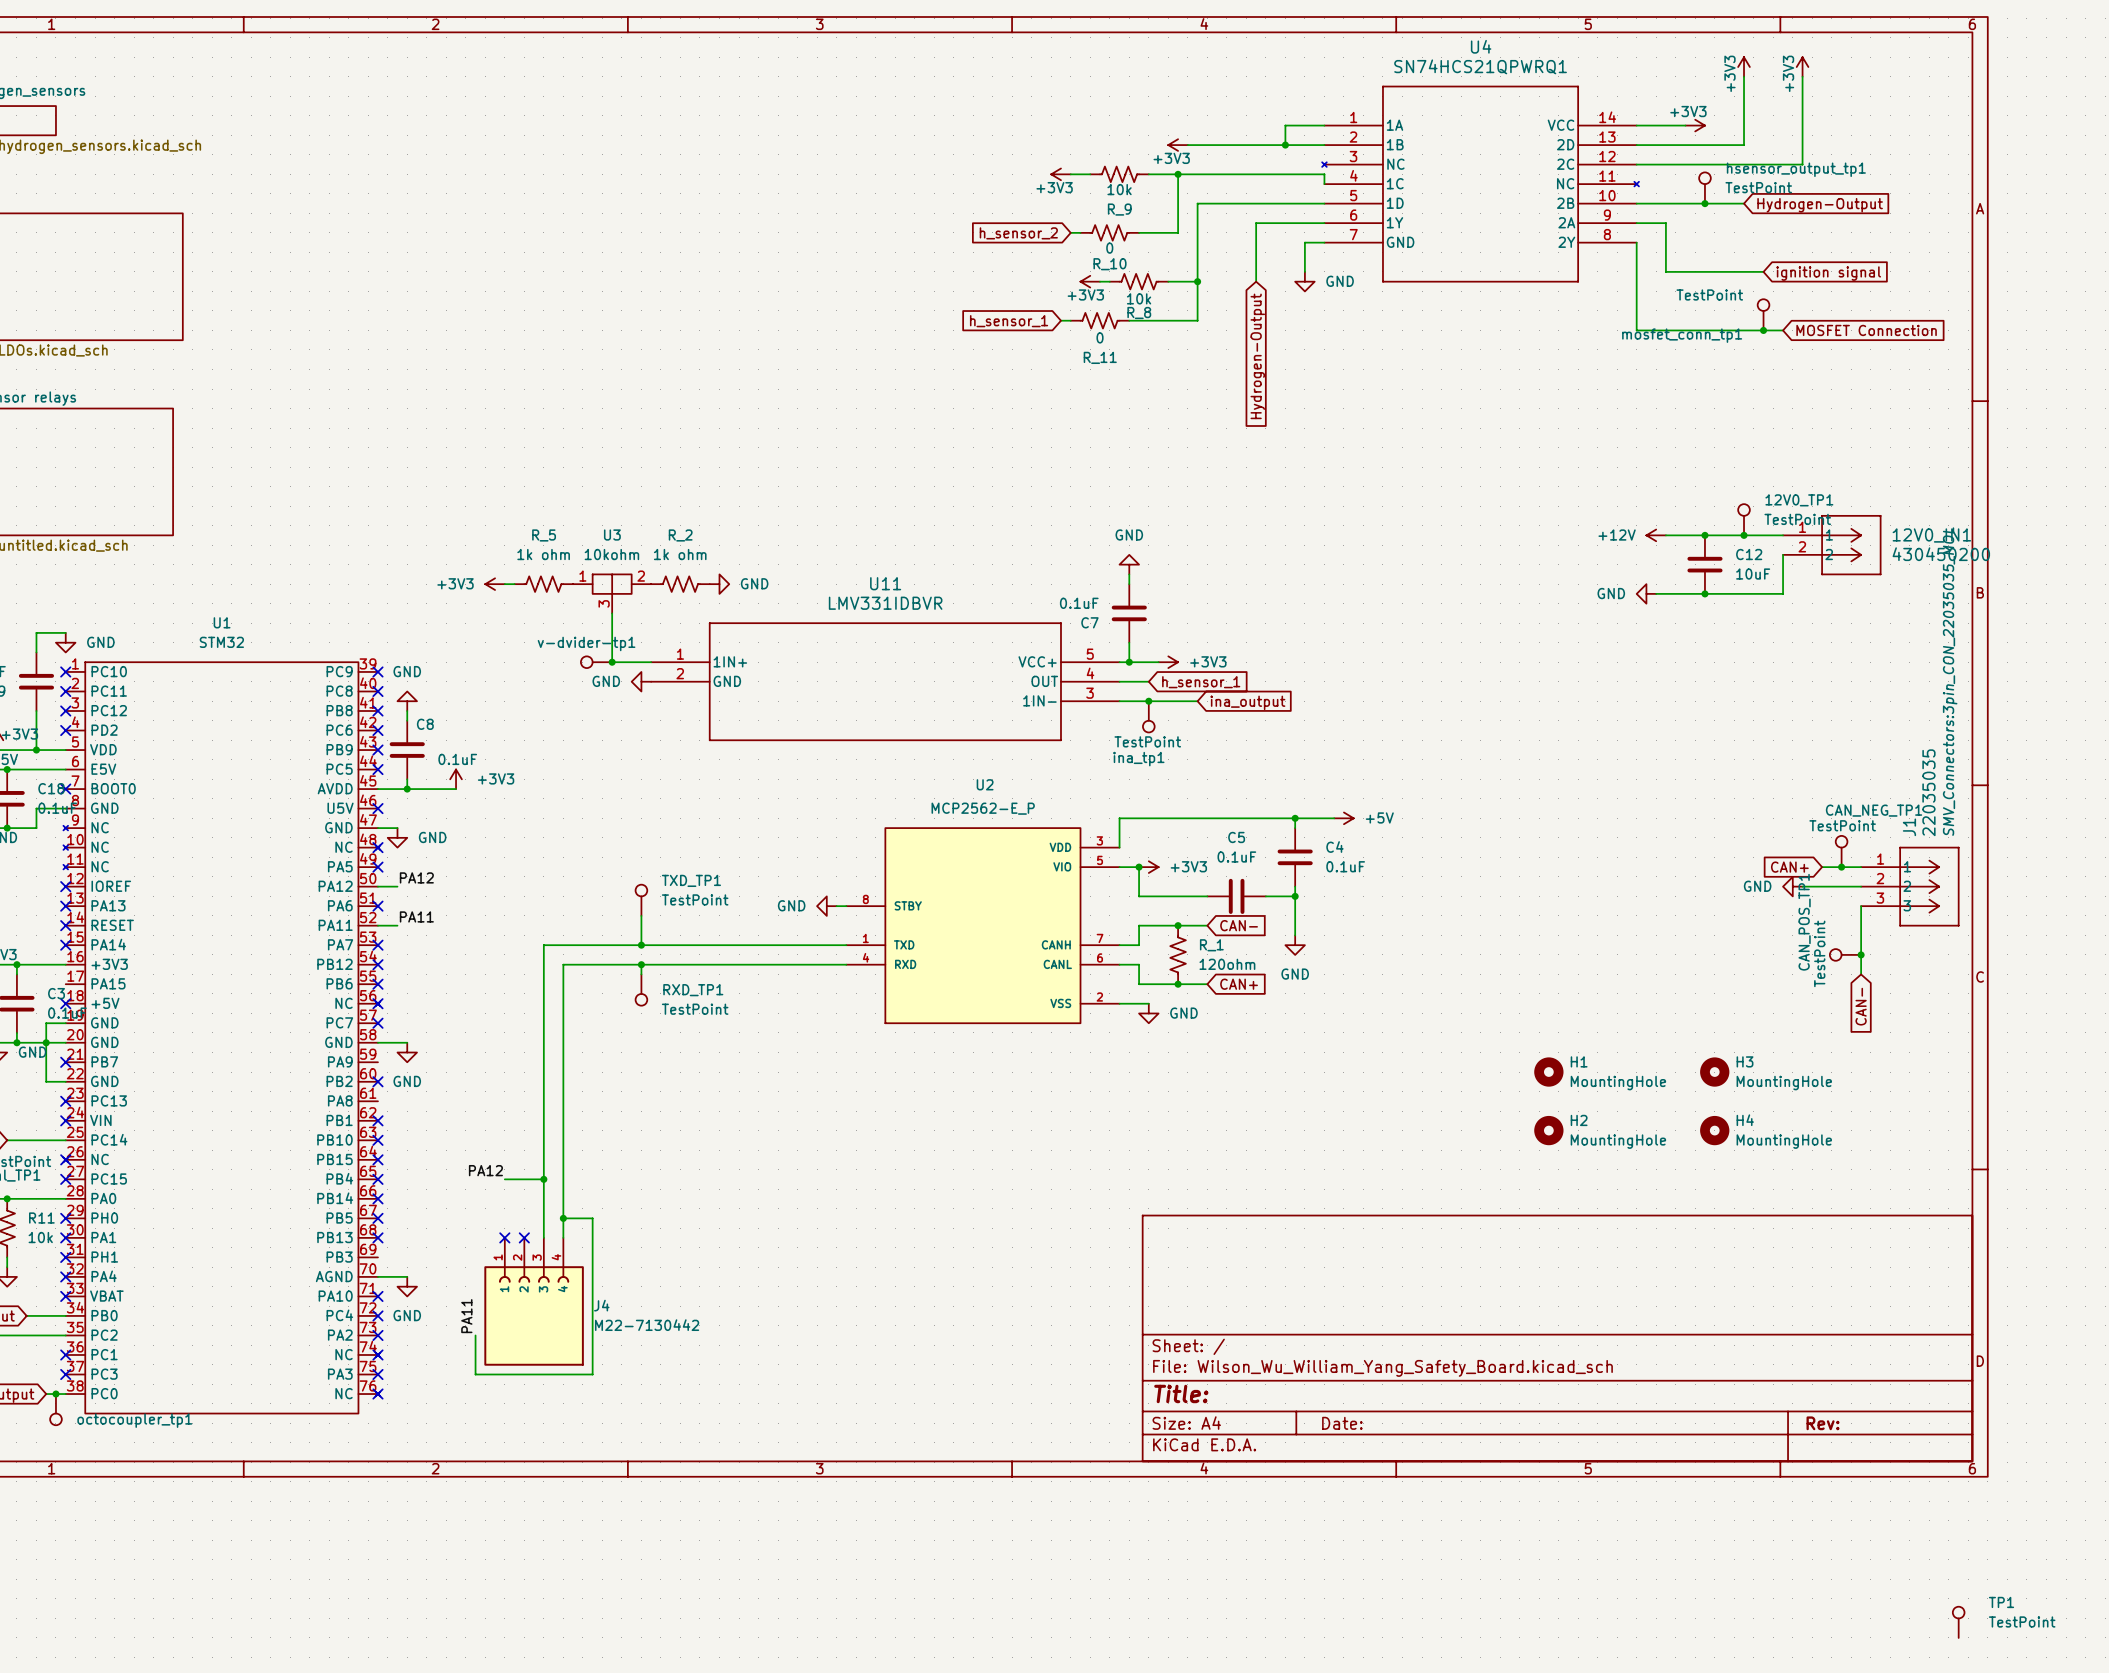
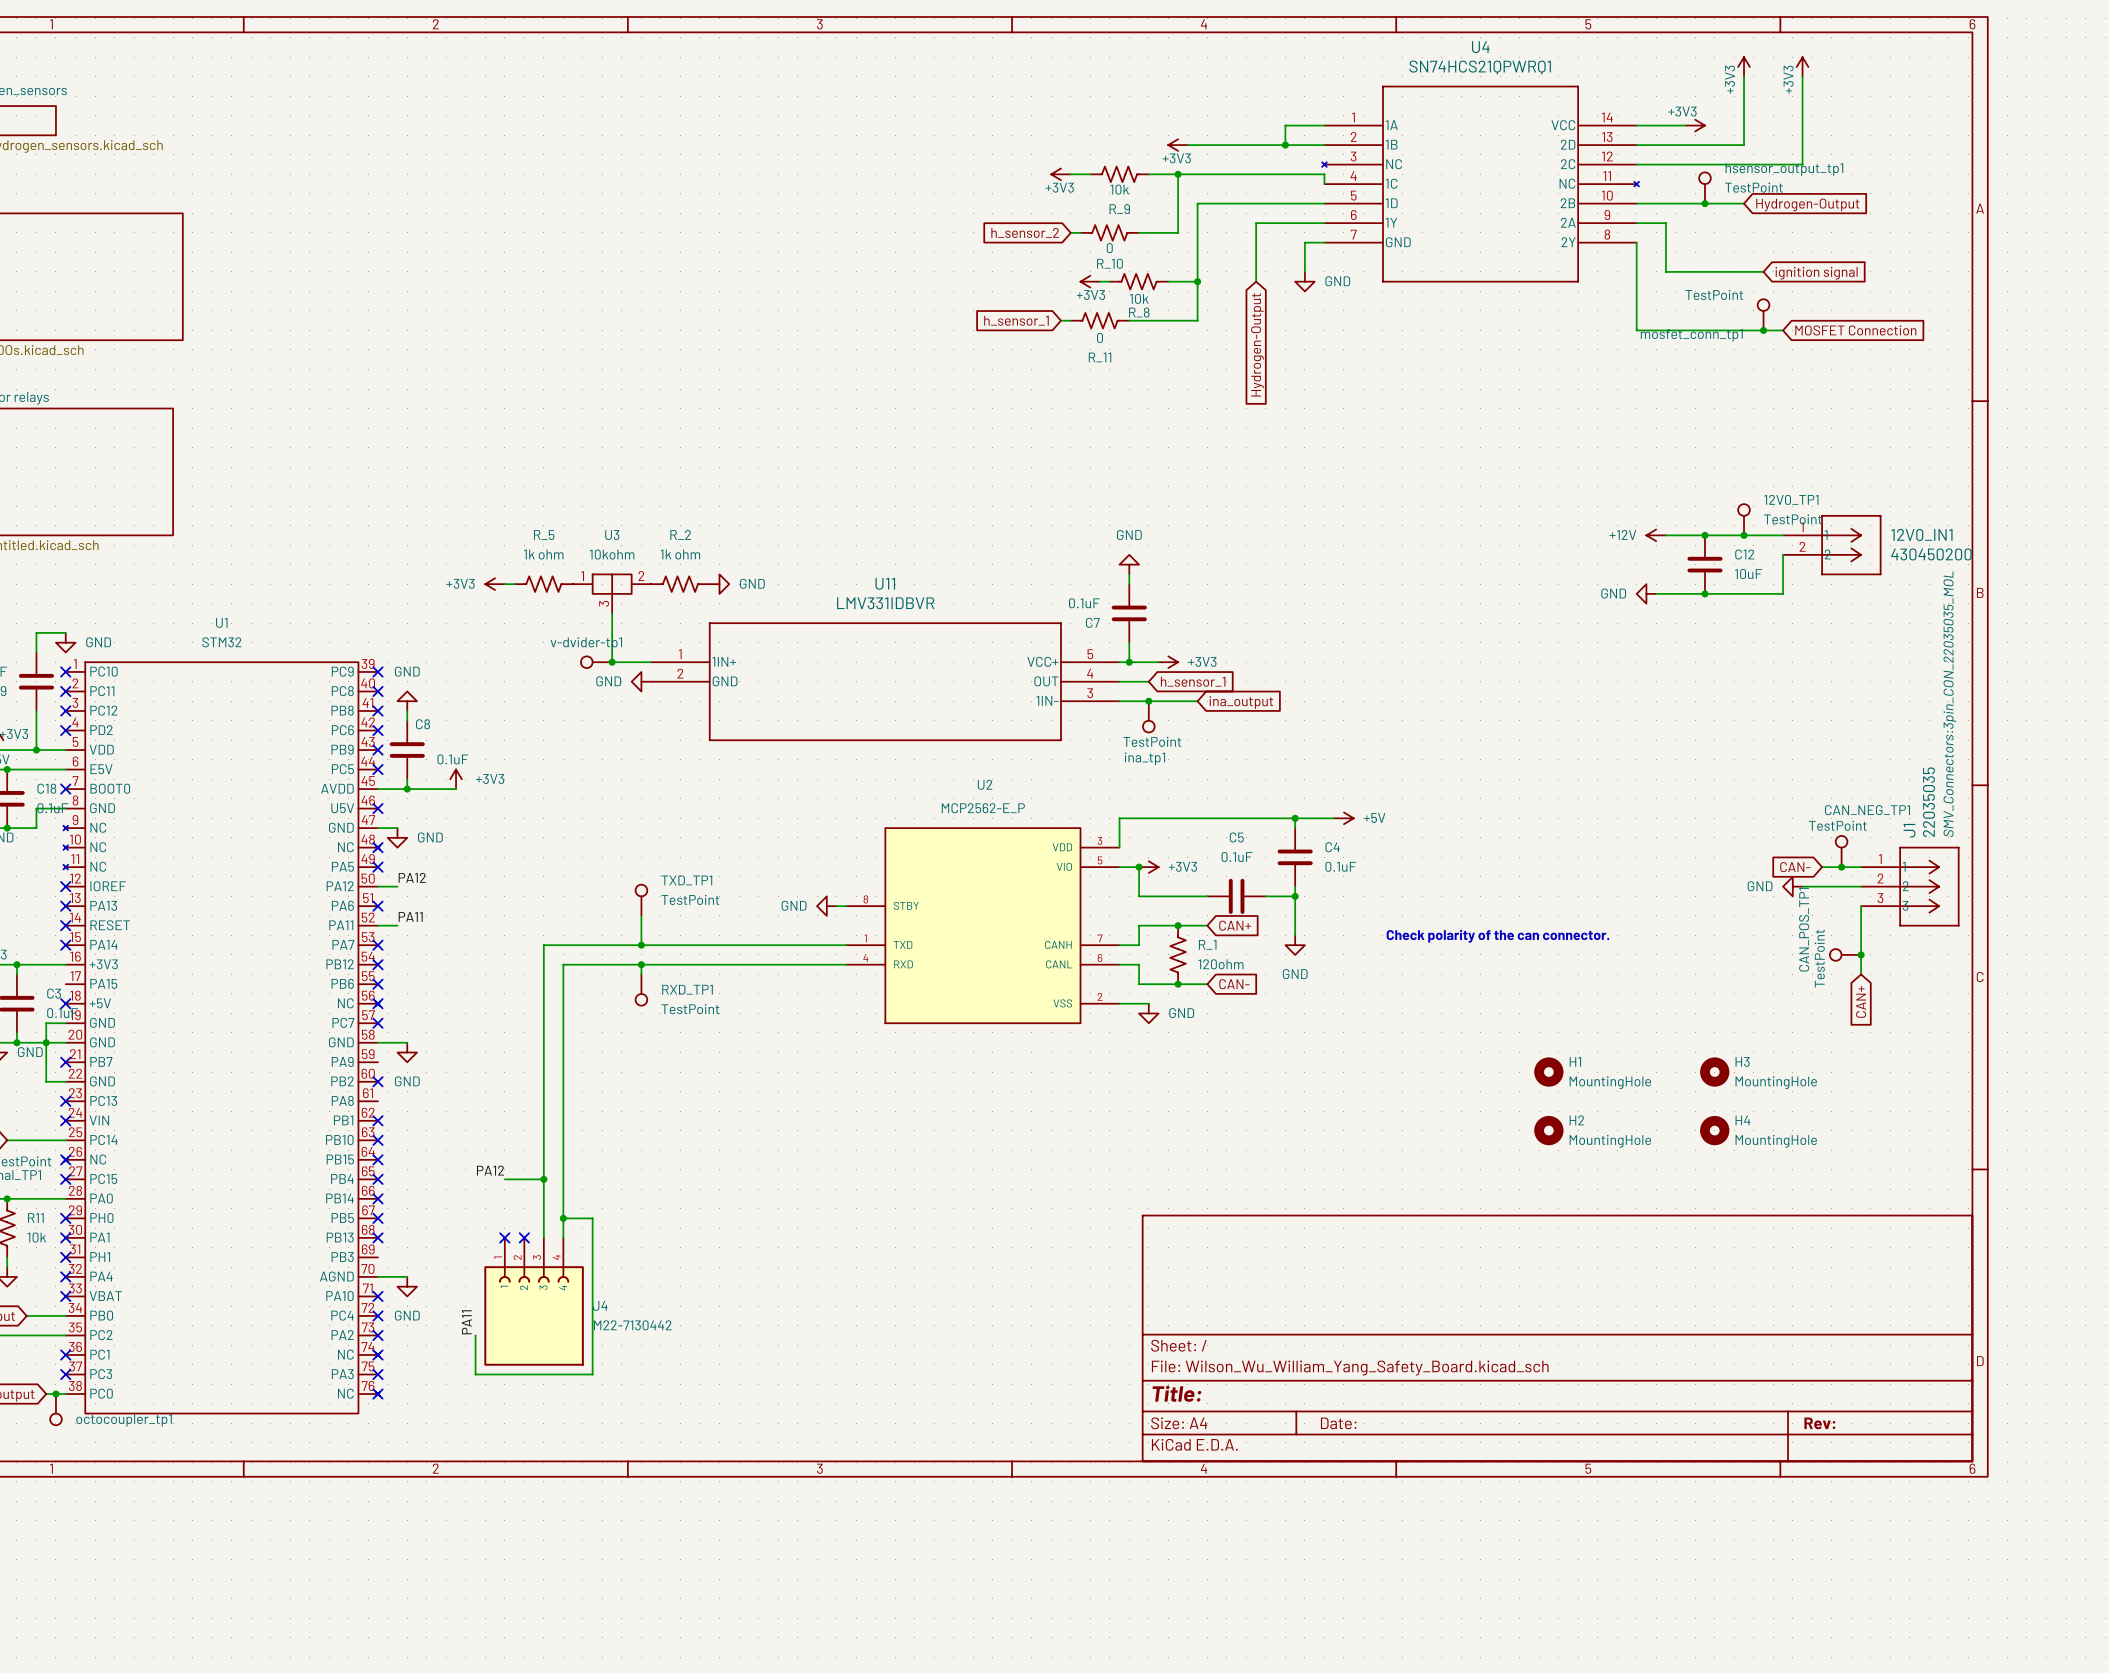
global label: CAN+ (1789, 867) -> CAN- (1795, 867)
global label: CAN- (1239, 925) -> CAN+ (1235, 925)
text: none -> Check polarity of the can connector. (1498, 936)
global label: CAN+ (1239, 984) -> CAN- (1234, 984)
global label: CAN- (1861, 1006) -> CAN+ (1861, 1001)
TP1: TestPoint (1958, 1622) -> none

